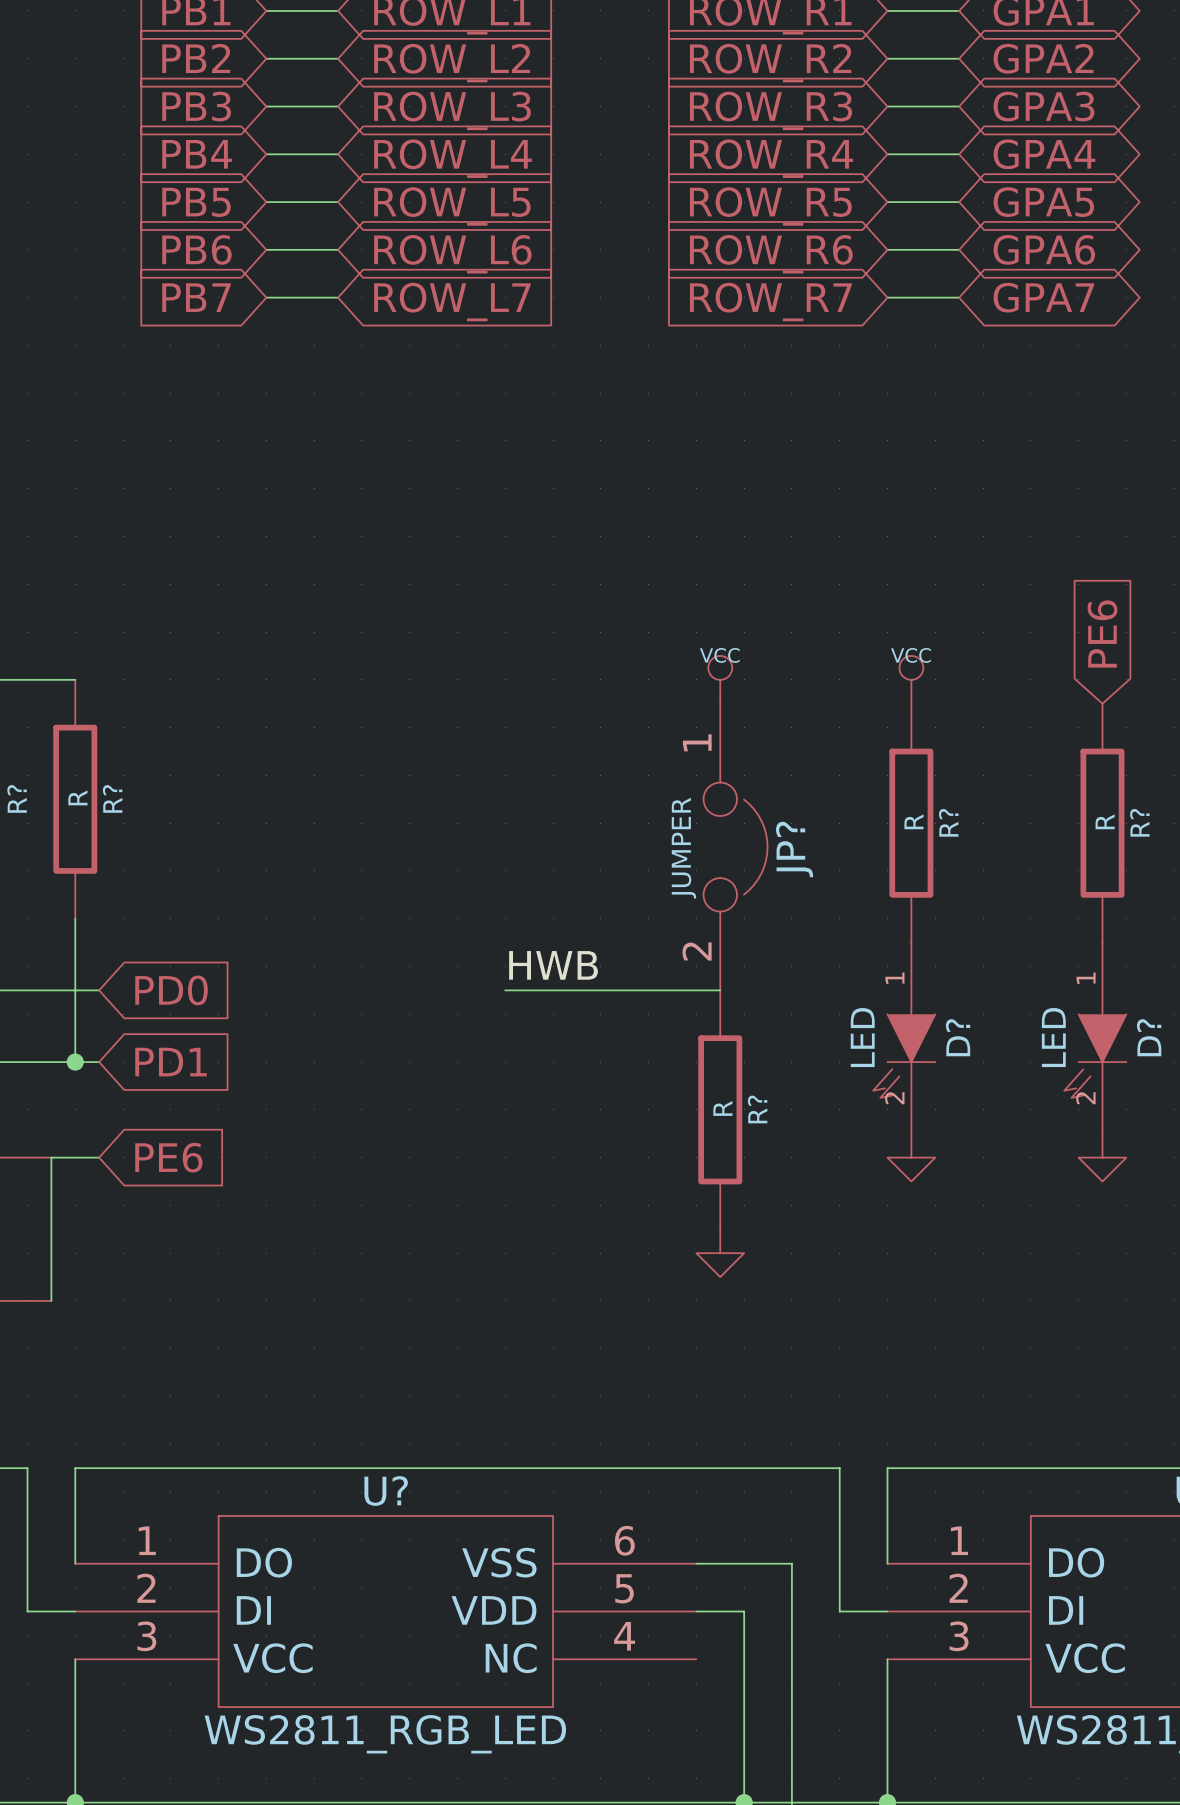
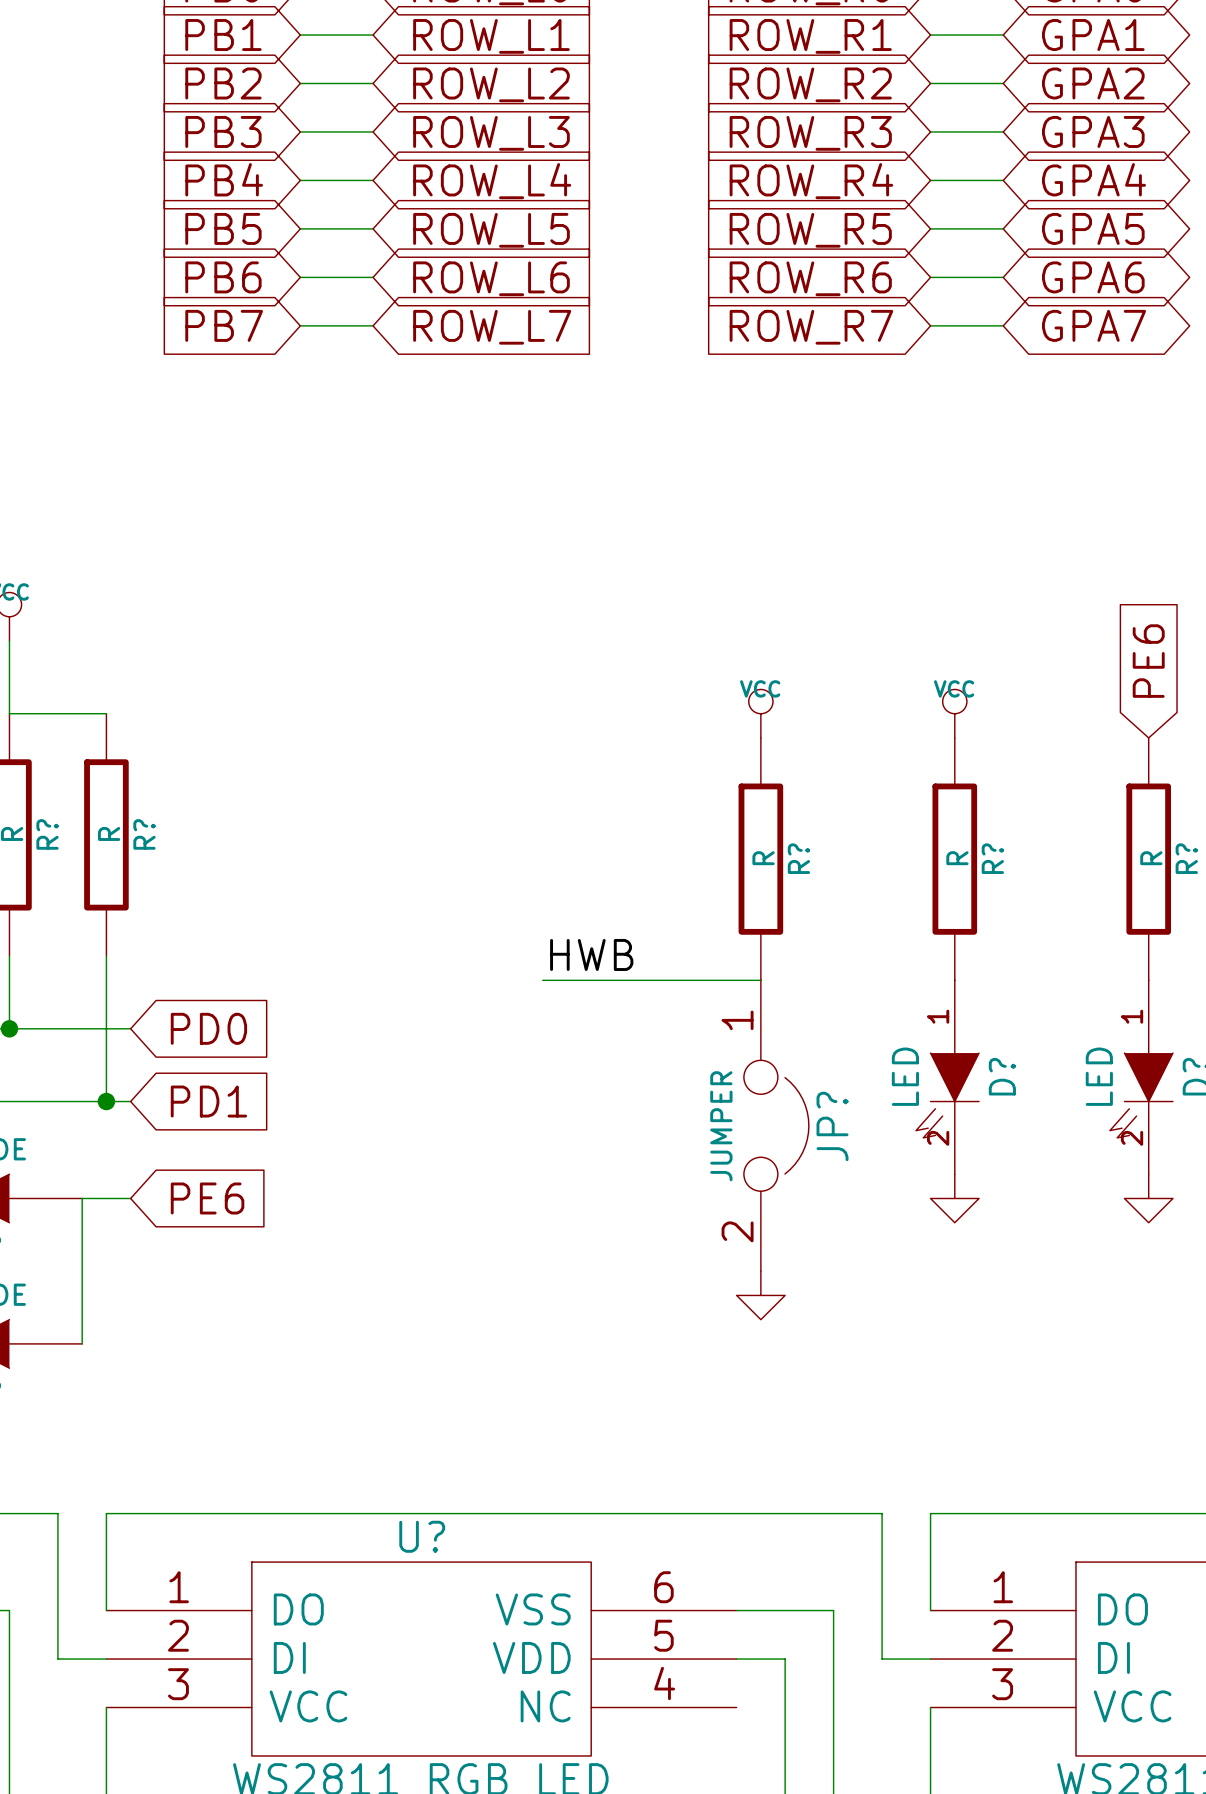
JP? position: (735, 847) -> (776, 1125)
label position: HWB (553, 965) -> HWB (591, 954)
wire: (505, 990) (720, 990) -> (542, 980) (760, 980)
R? position: (720, 1109) -> (760, 859)

